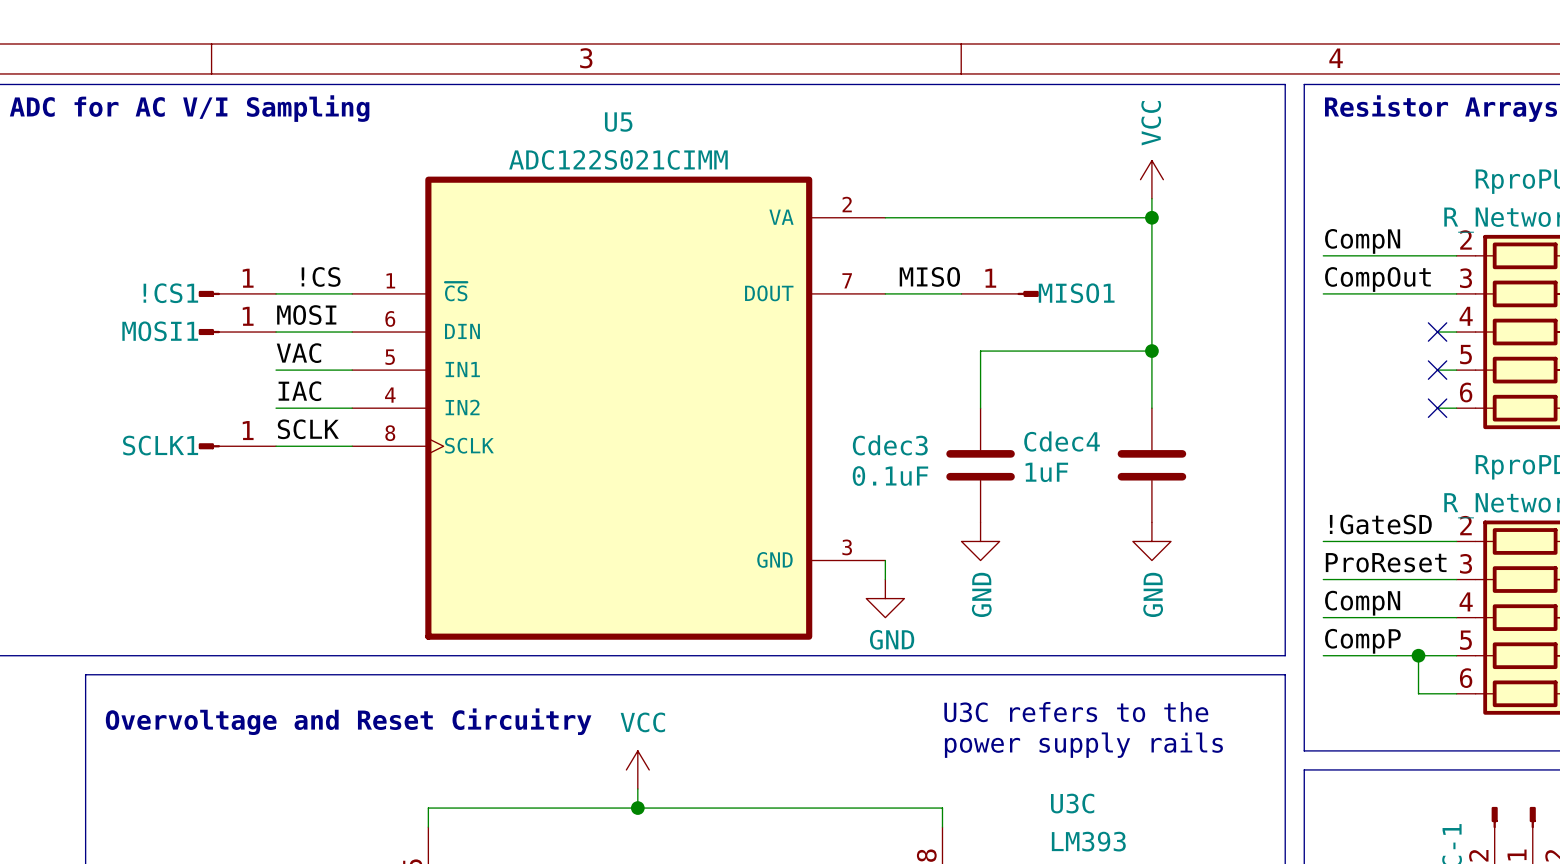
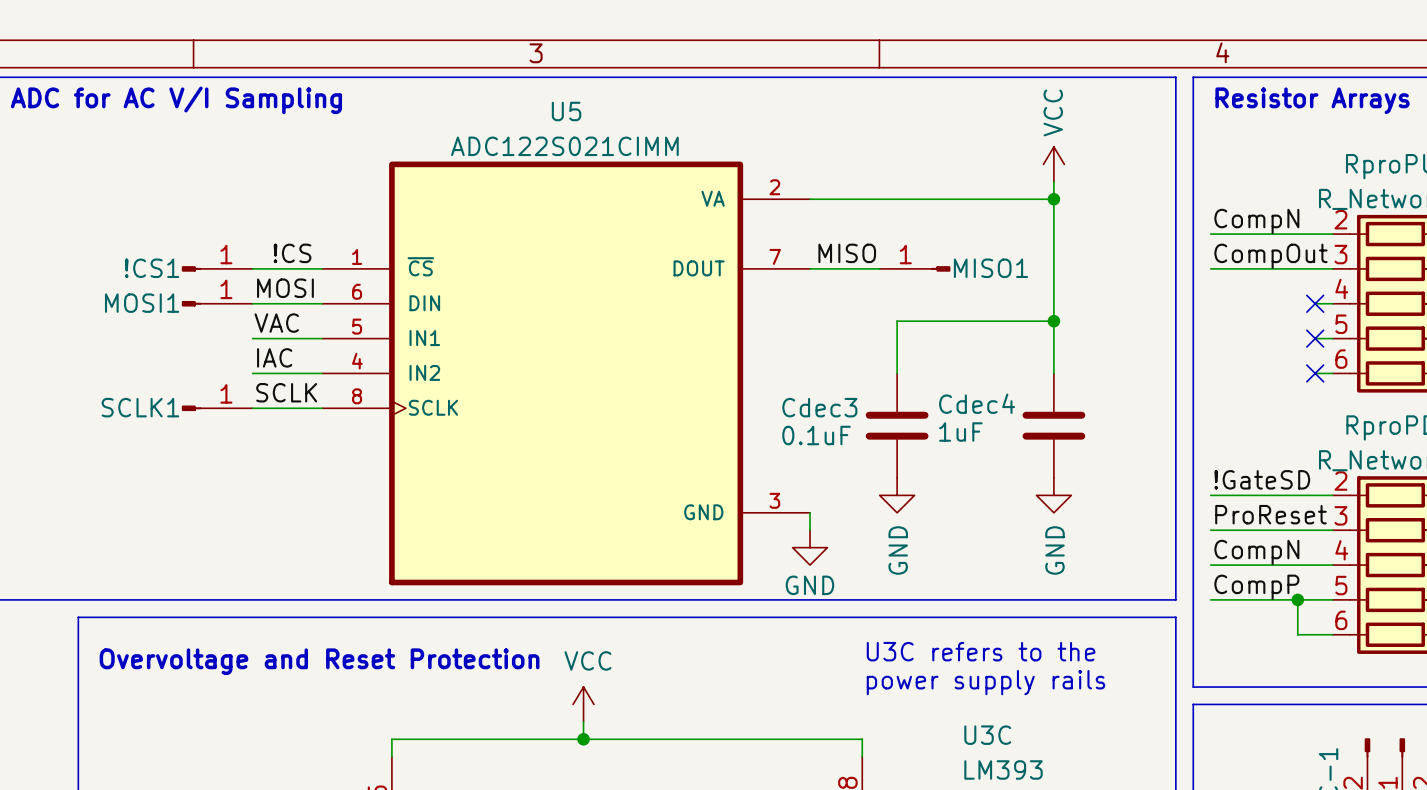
text: Overvoltage and Reset Circuitry (348, 721) -> Overvoltage and Reset Protection (319, 661)

